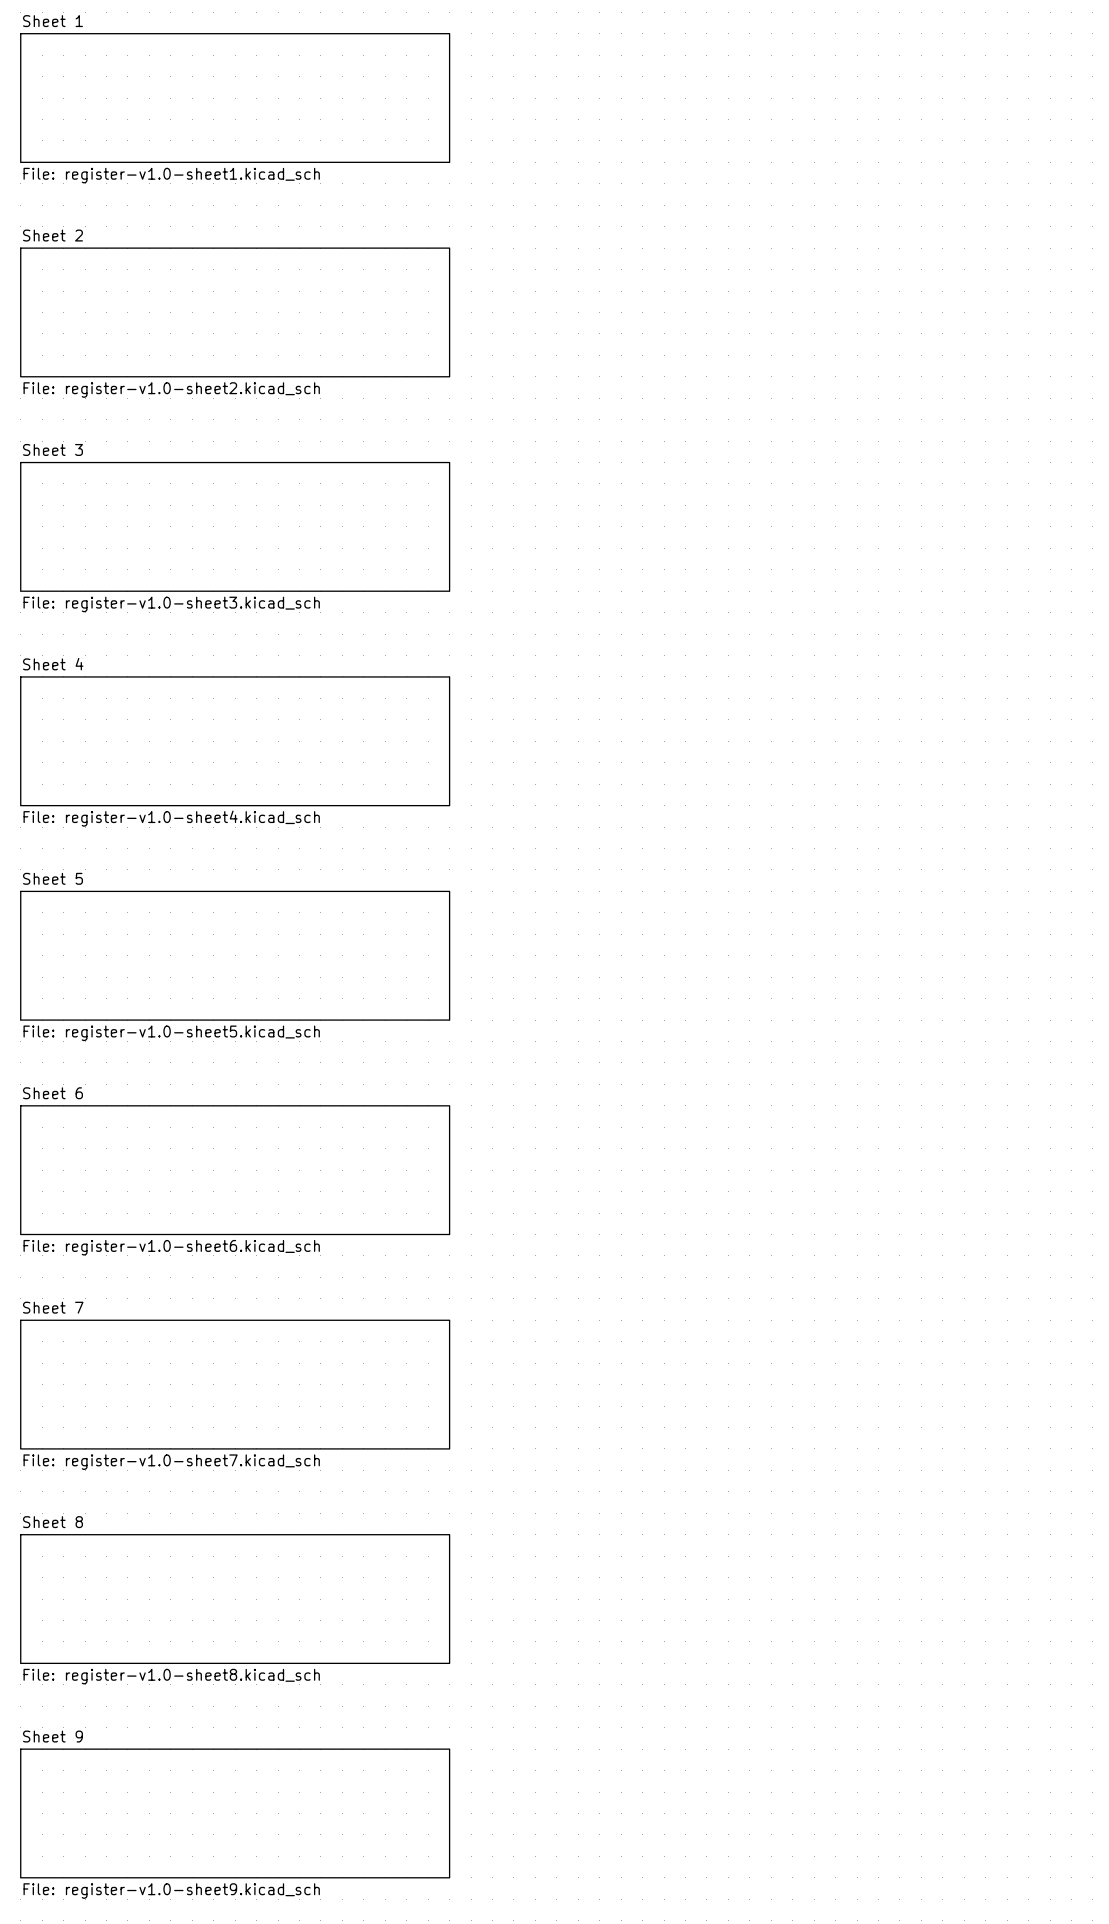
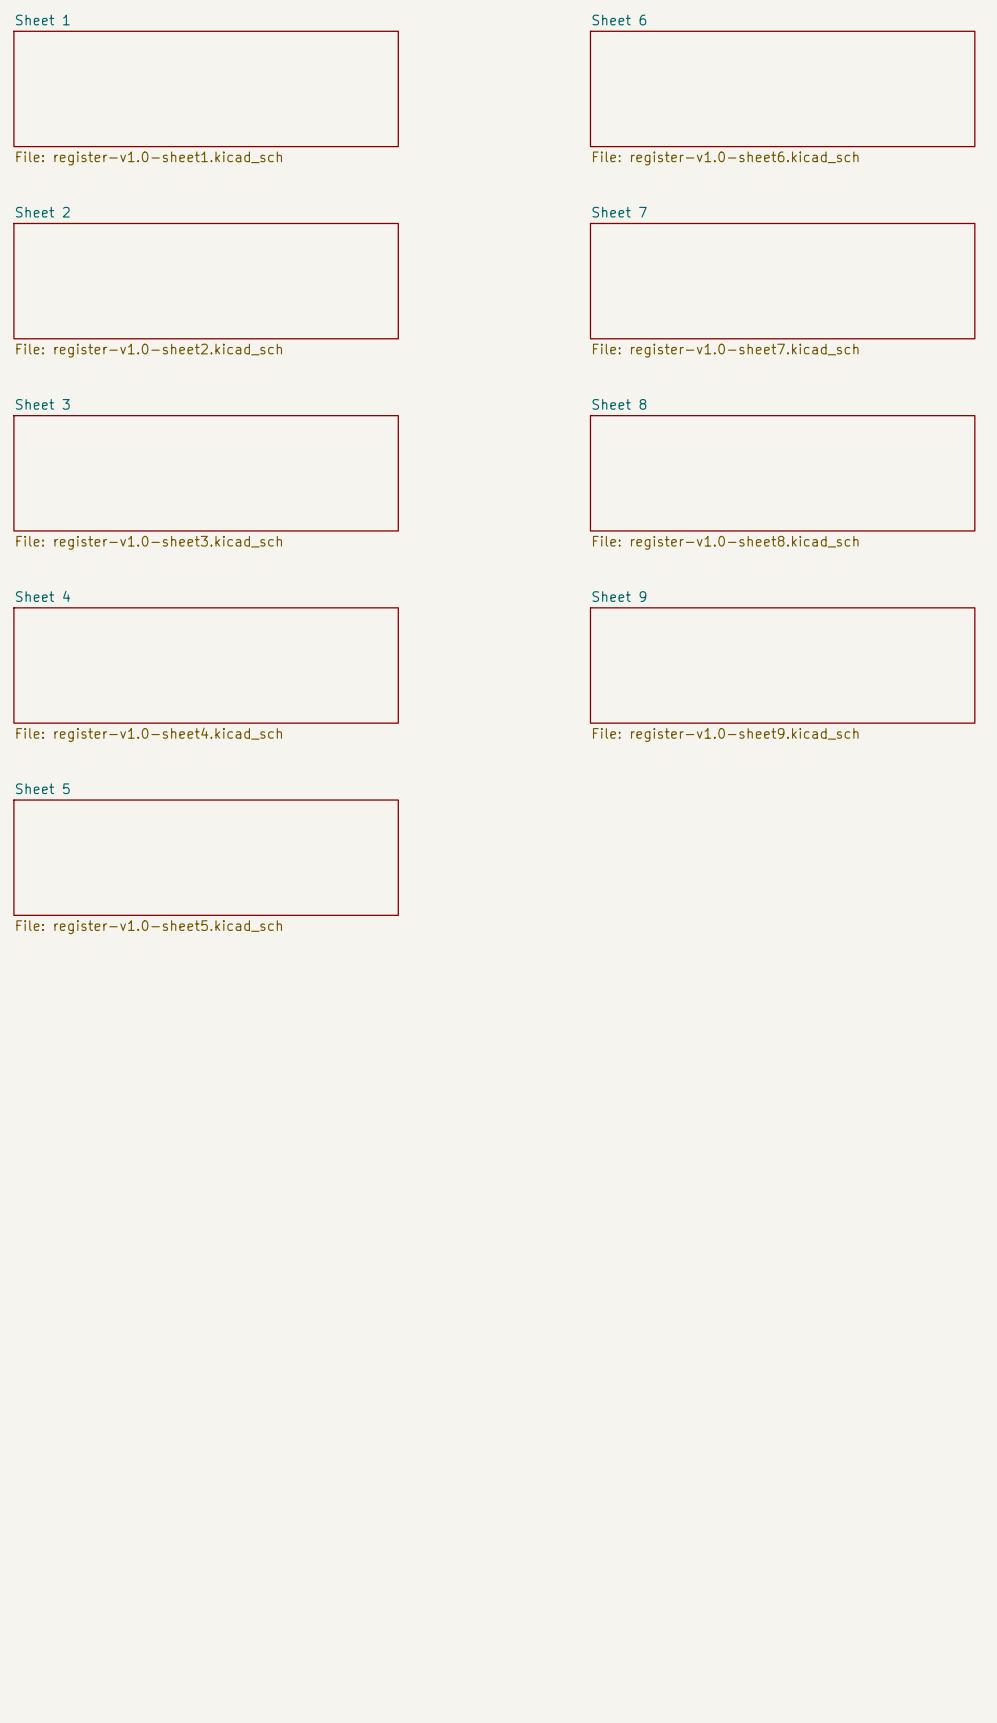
sheet Sheet 6 position: (235, 1170) -> (782, 88)
sheet Sheet 7 position: (235, 1384) -> (782, 281)
sheet Sheet 8 position: (235, 1599) -> (782, 473)
sheet Sheet 9 position: (235, 1813) -> (782, 665)

